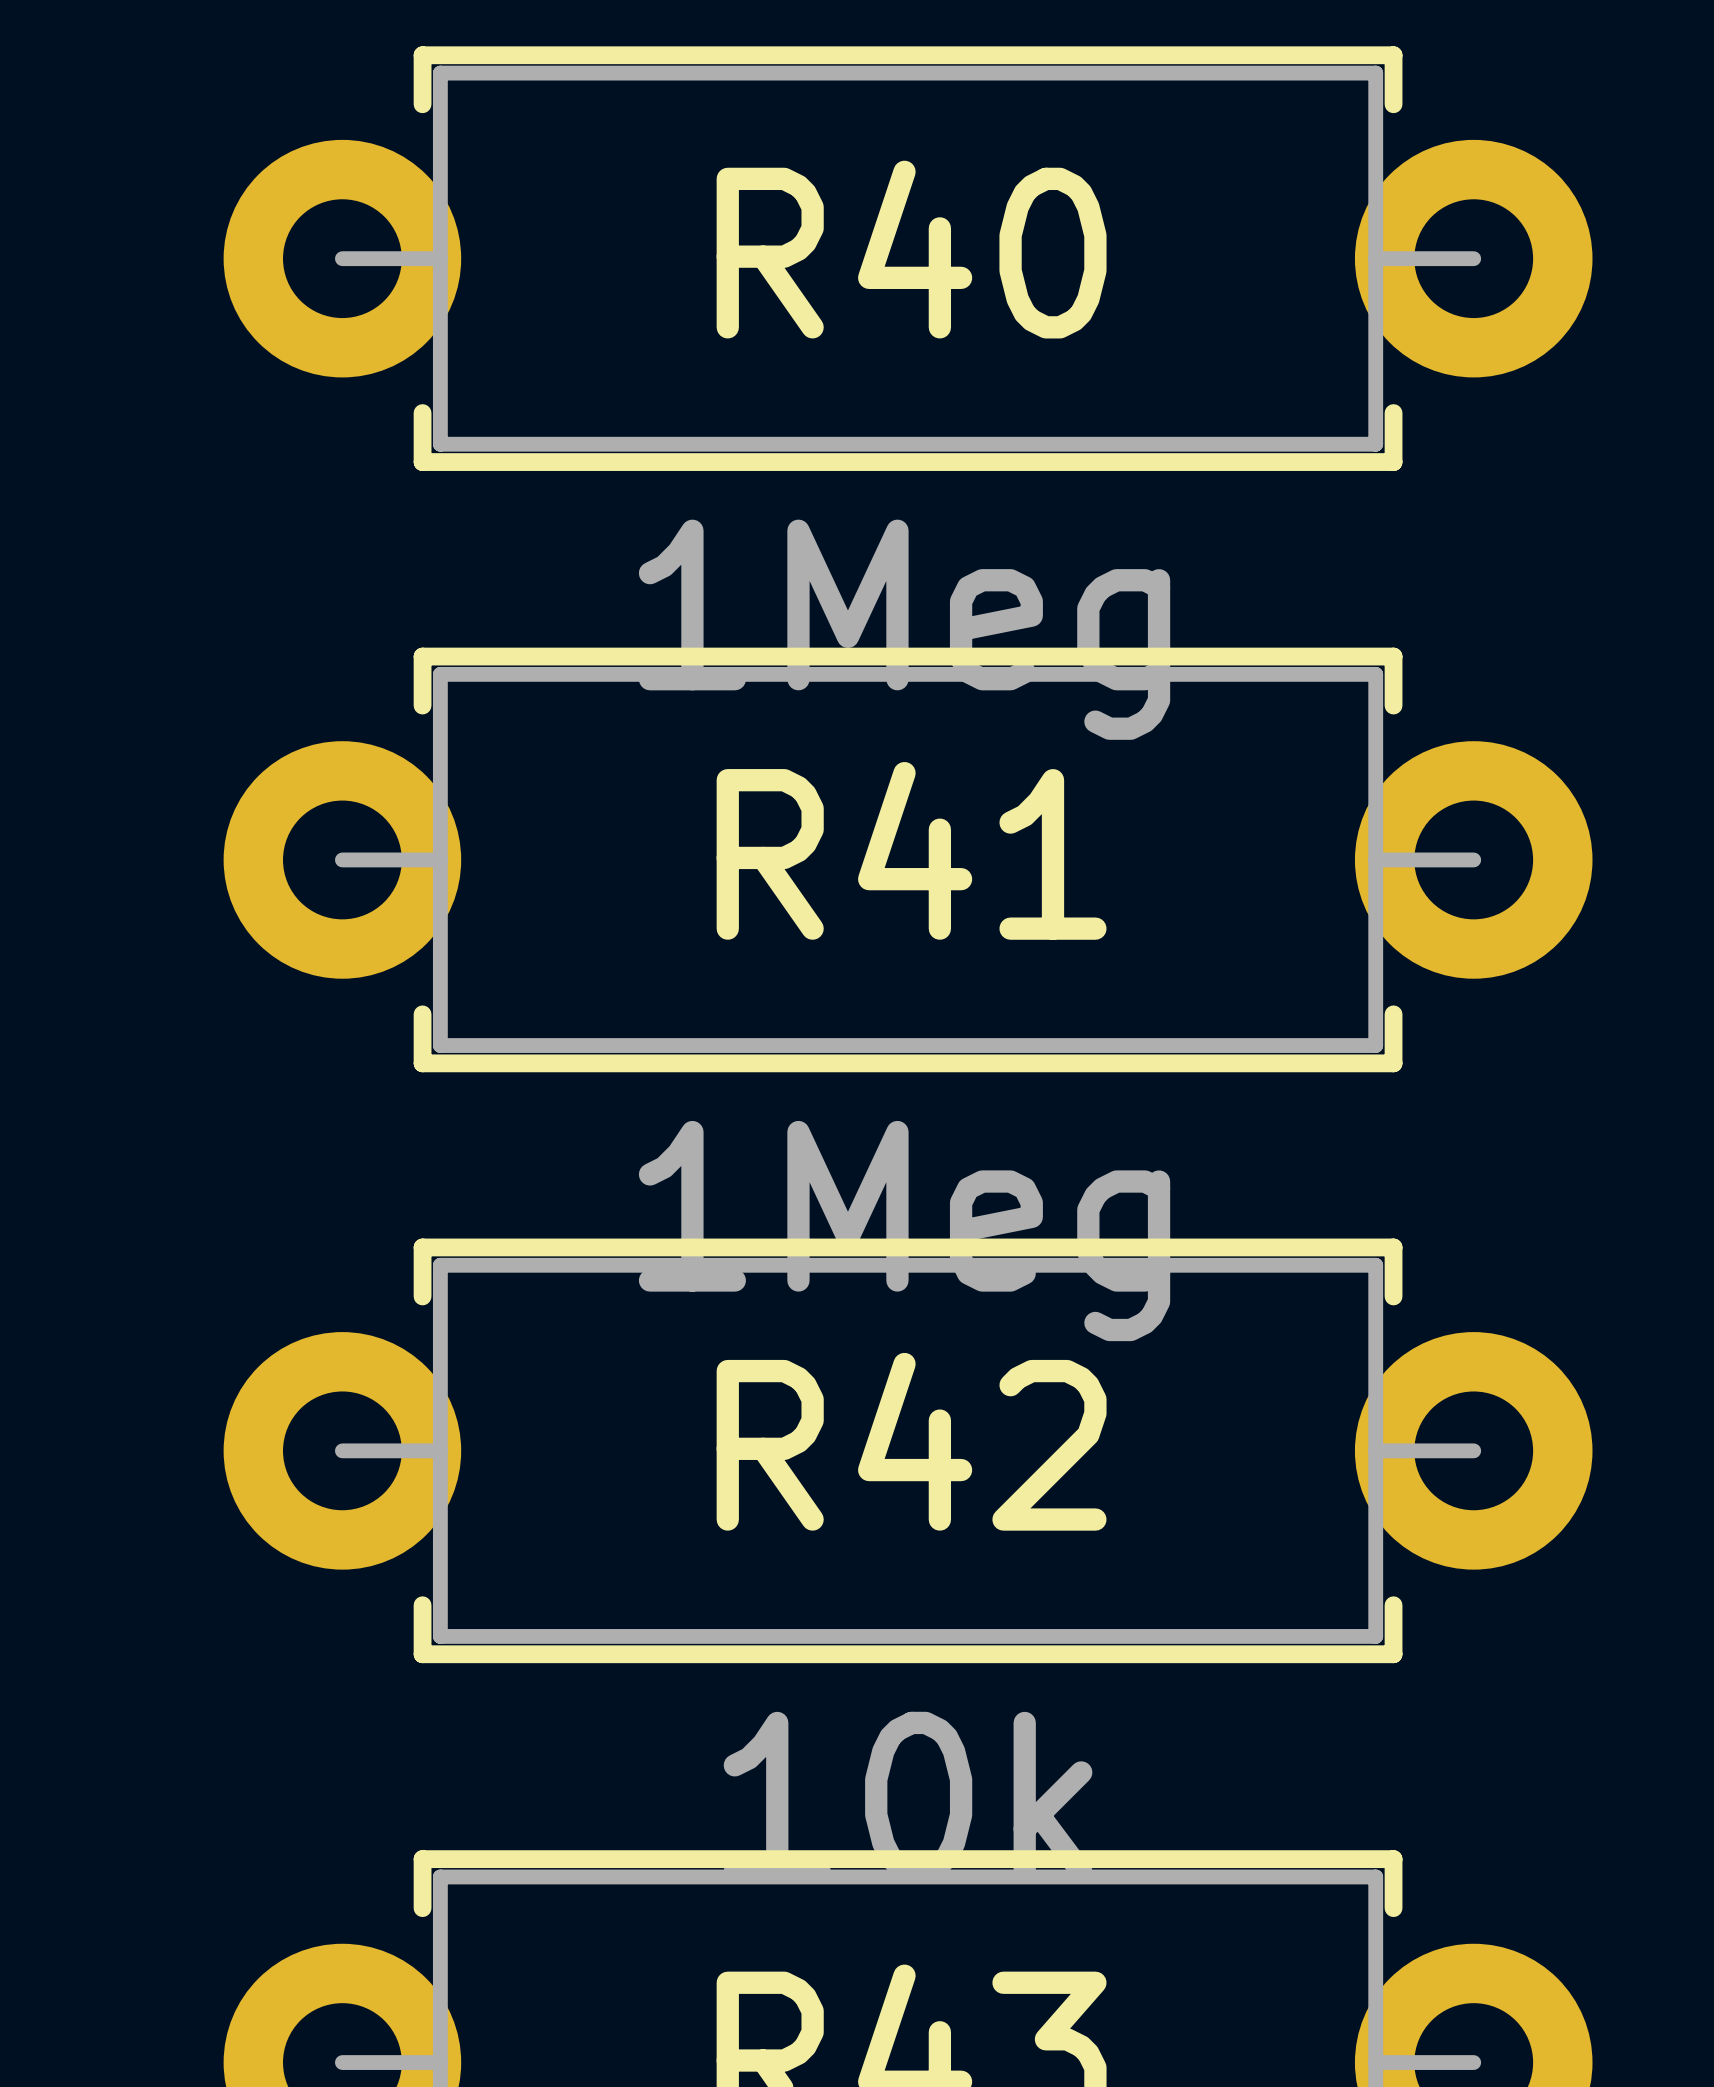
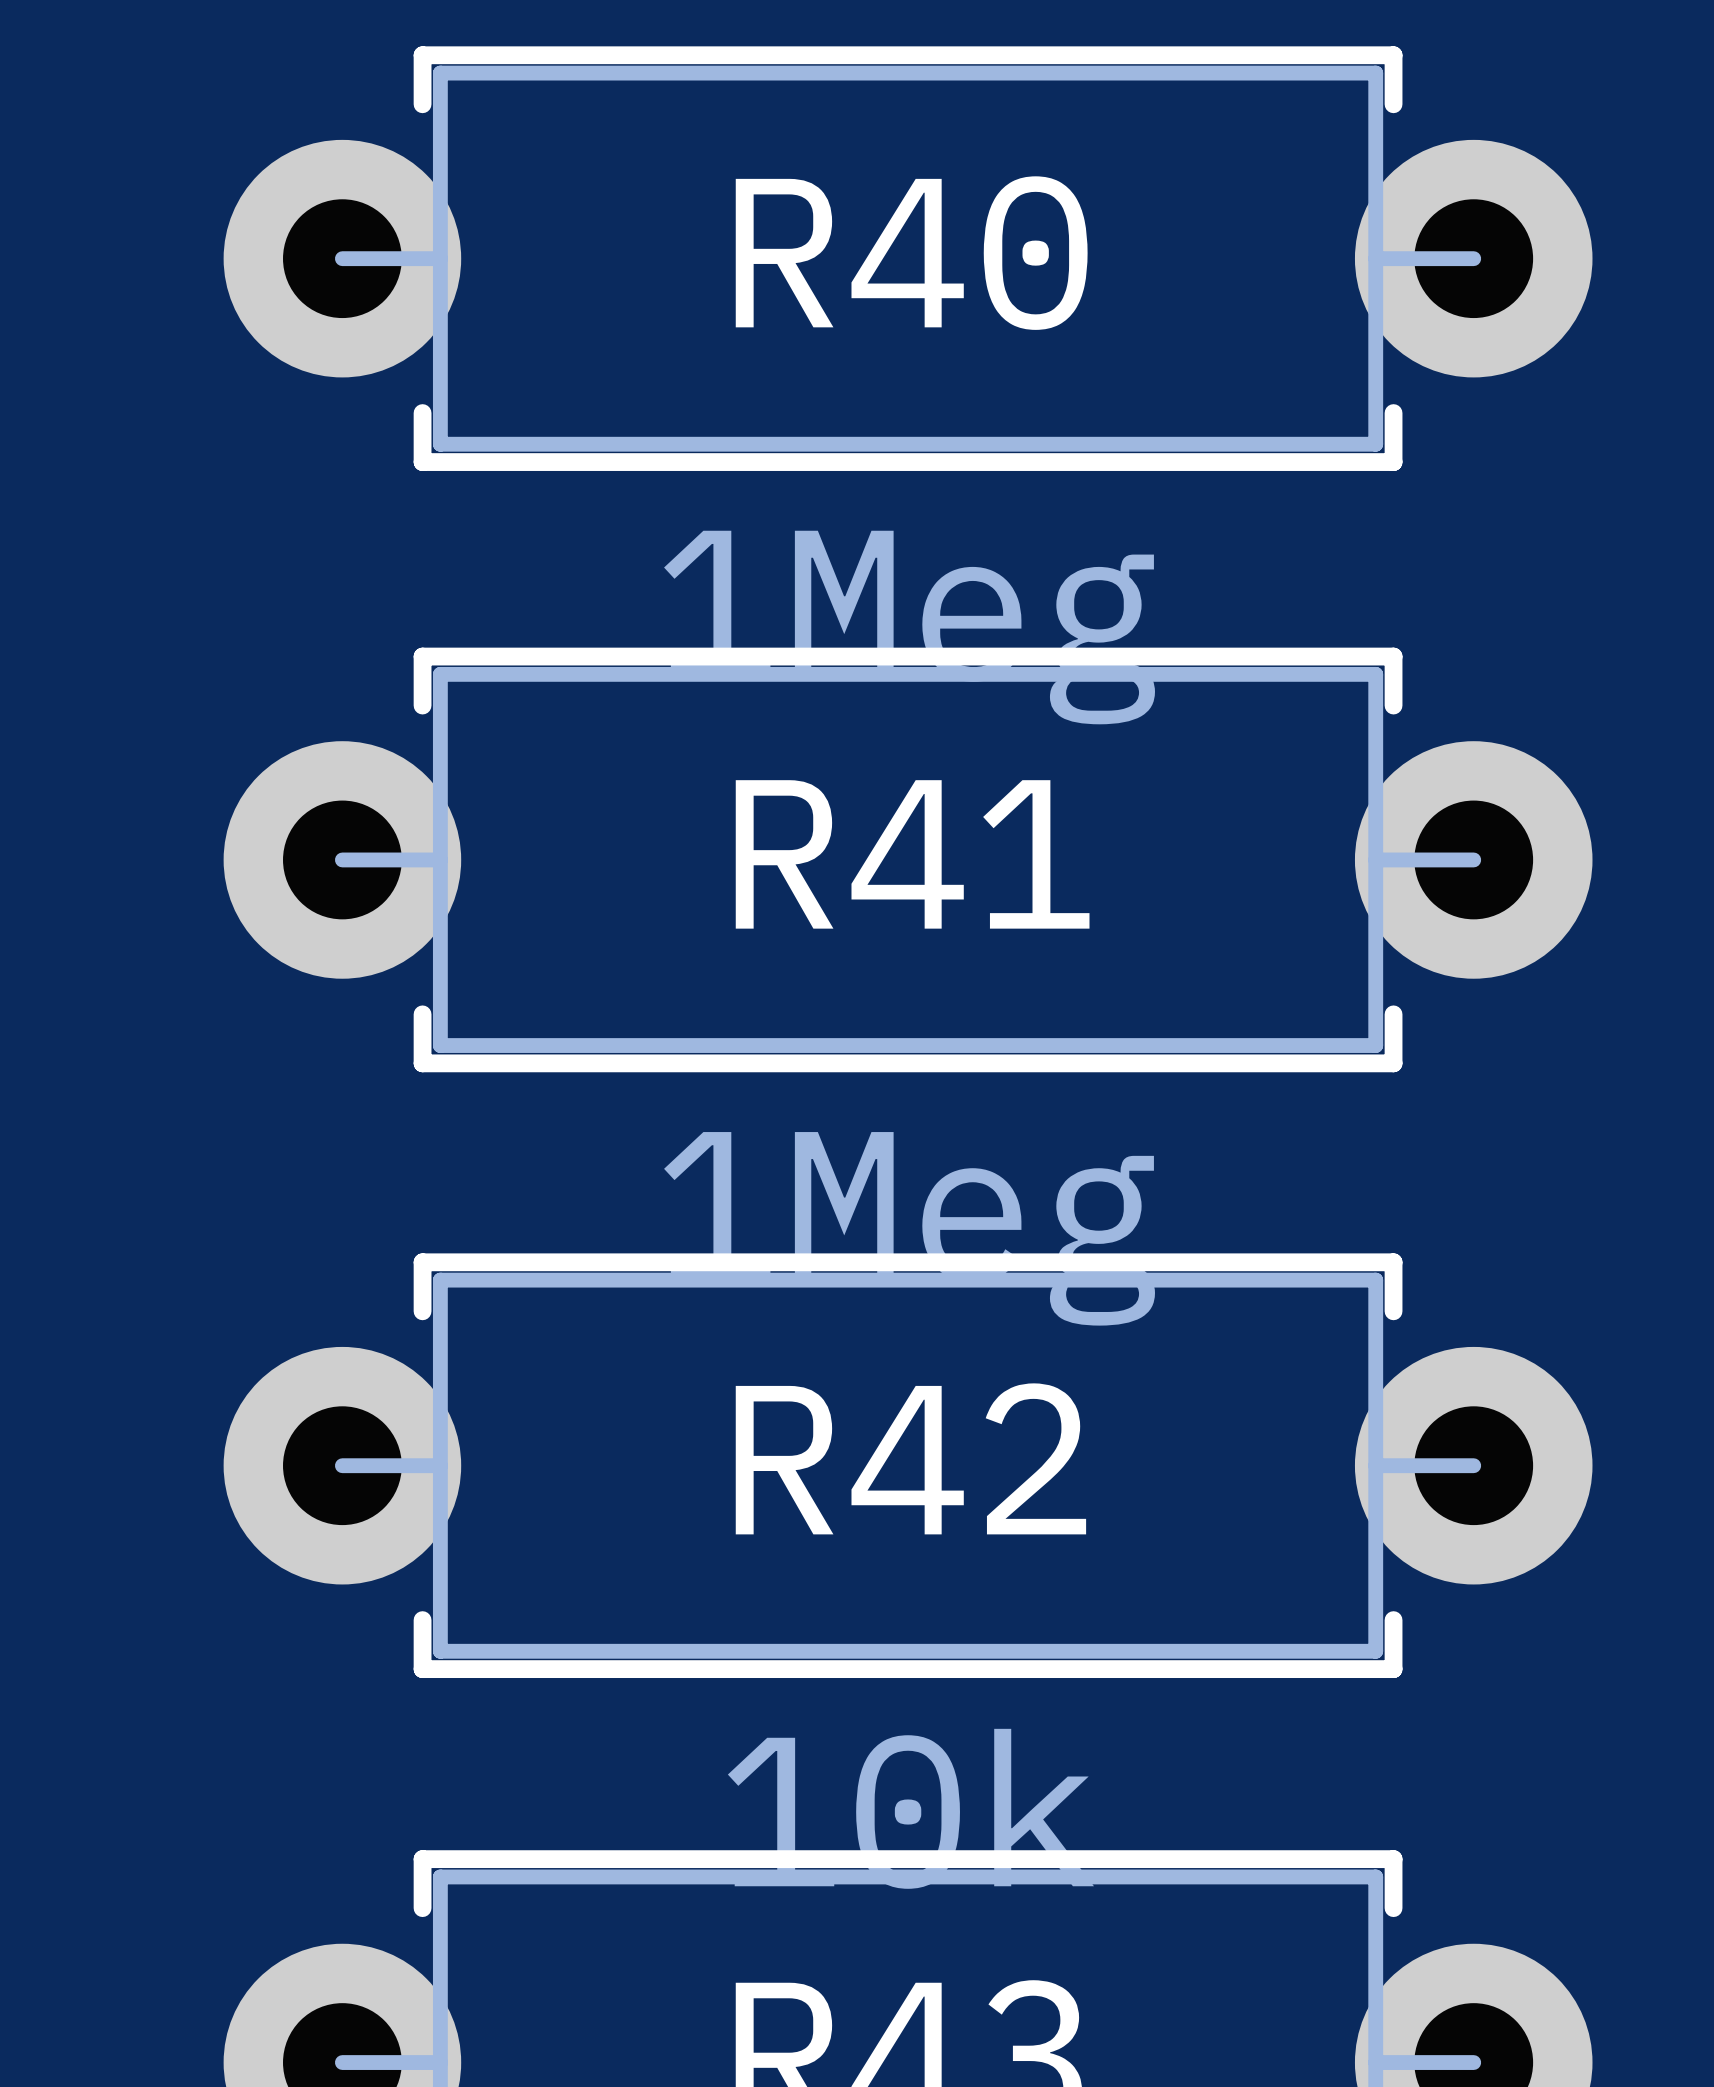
R42 position: (908, 1450) -> (908, 1465)

